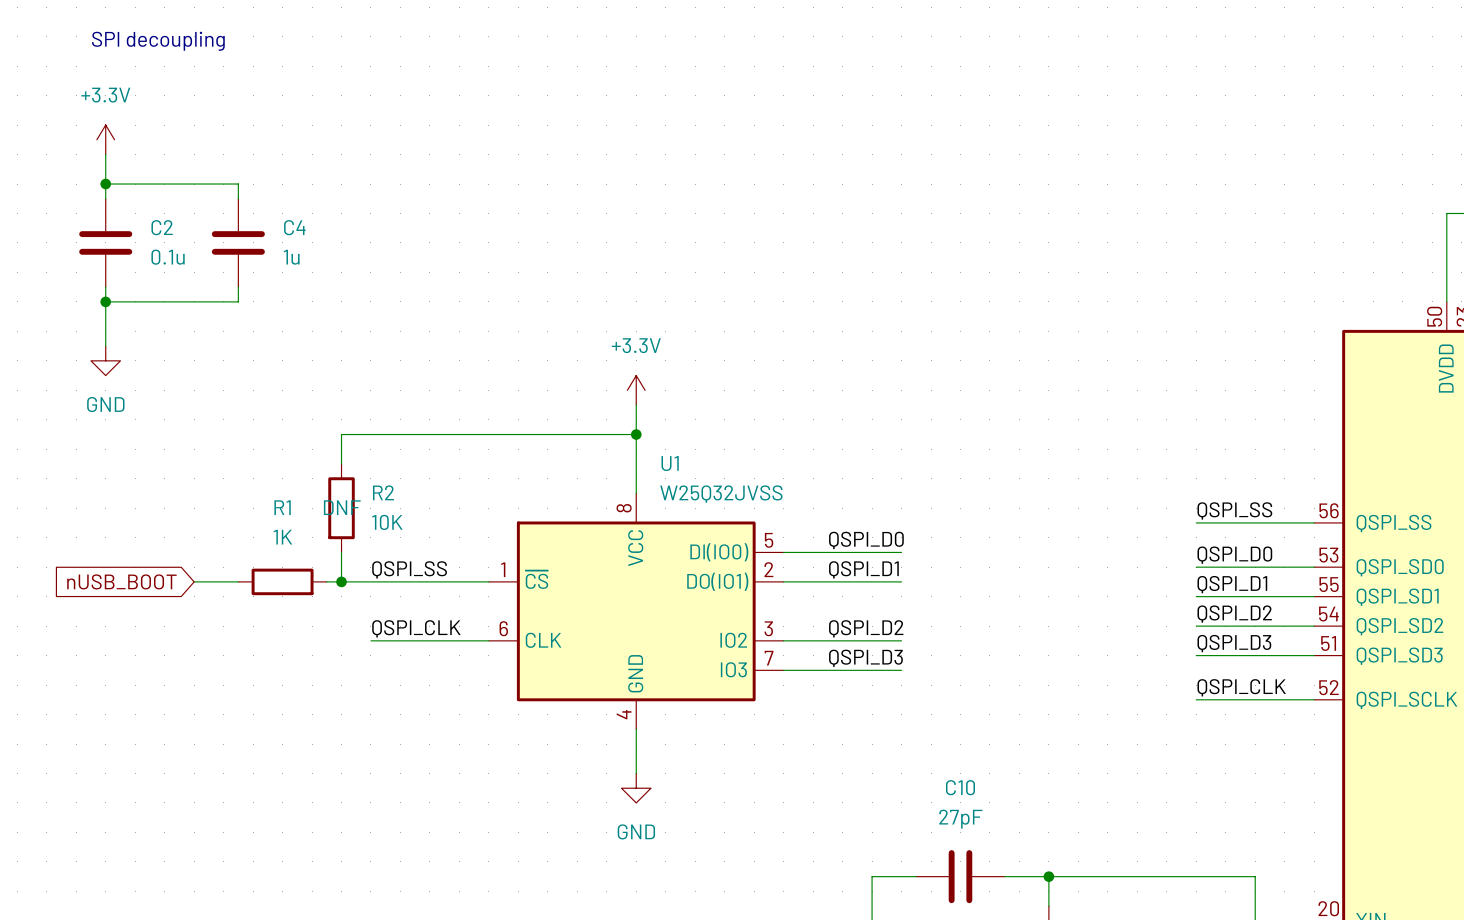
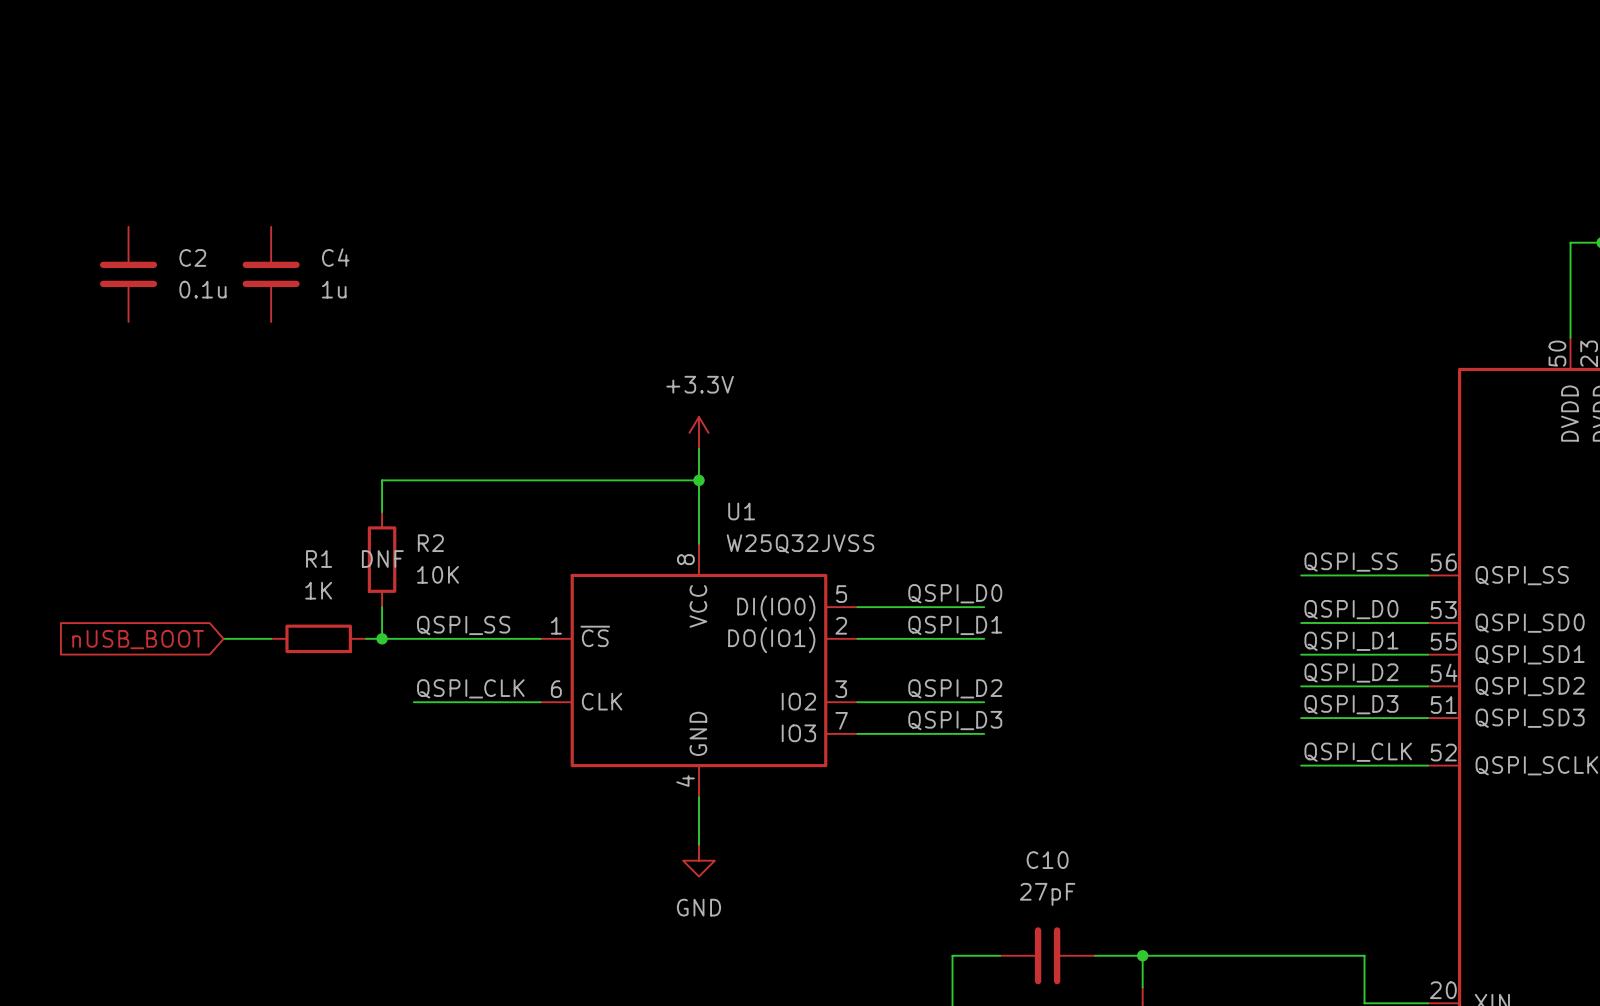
text: SPI decoupling (158, 41) -> none
power symbol: +3.3V (105, 139) -> none
wire: (105, 154) (105, 198) -> none
wire: (105, 184) (238, 184) (238, 198) -> none
junction: (105, 184) -> none
wire: (105, 287) (105, 346) -> none
wire: (238, 287) (238, 301) (105, 301) -> none
junction: (105, 301) -> none
power symbol: GND (105, 360) -> none

